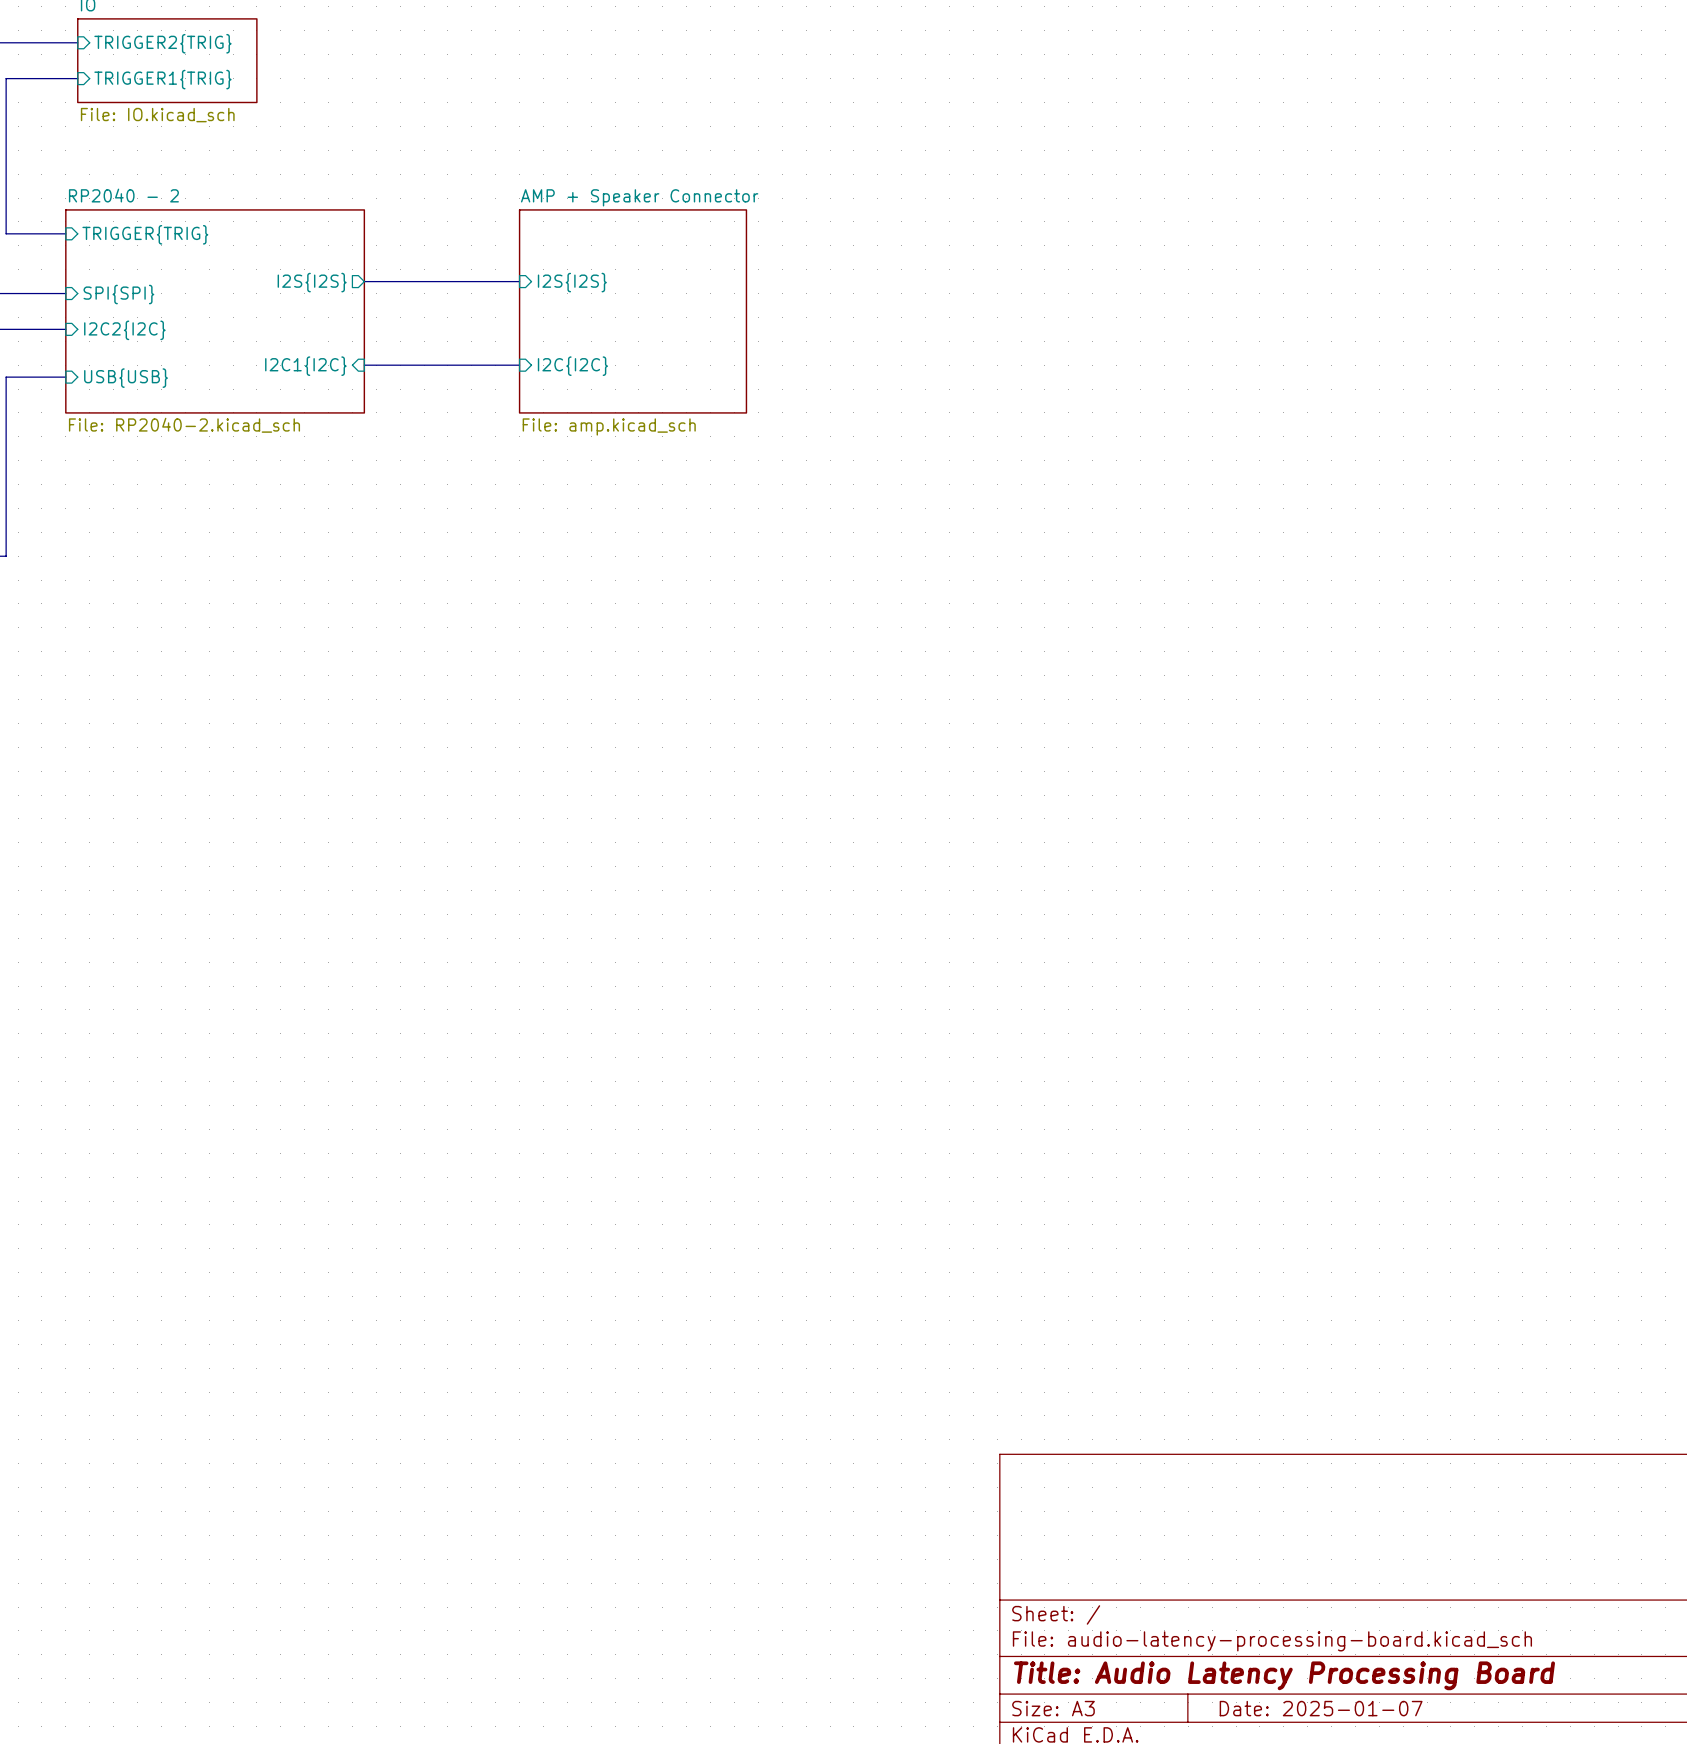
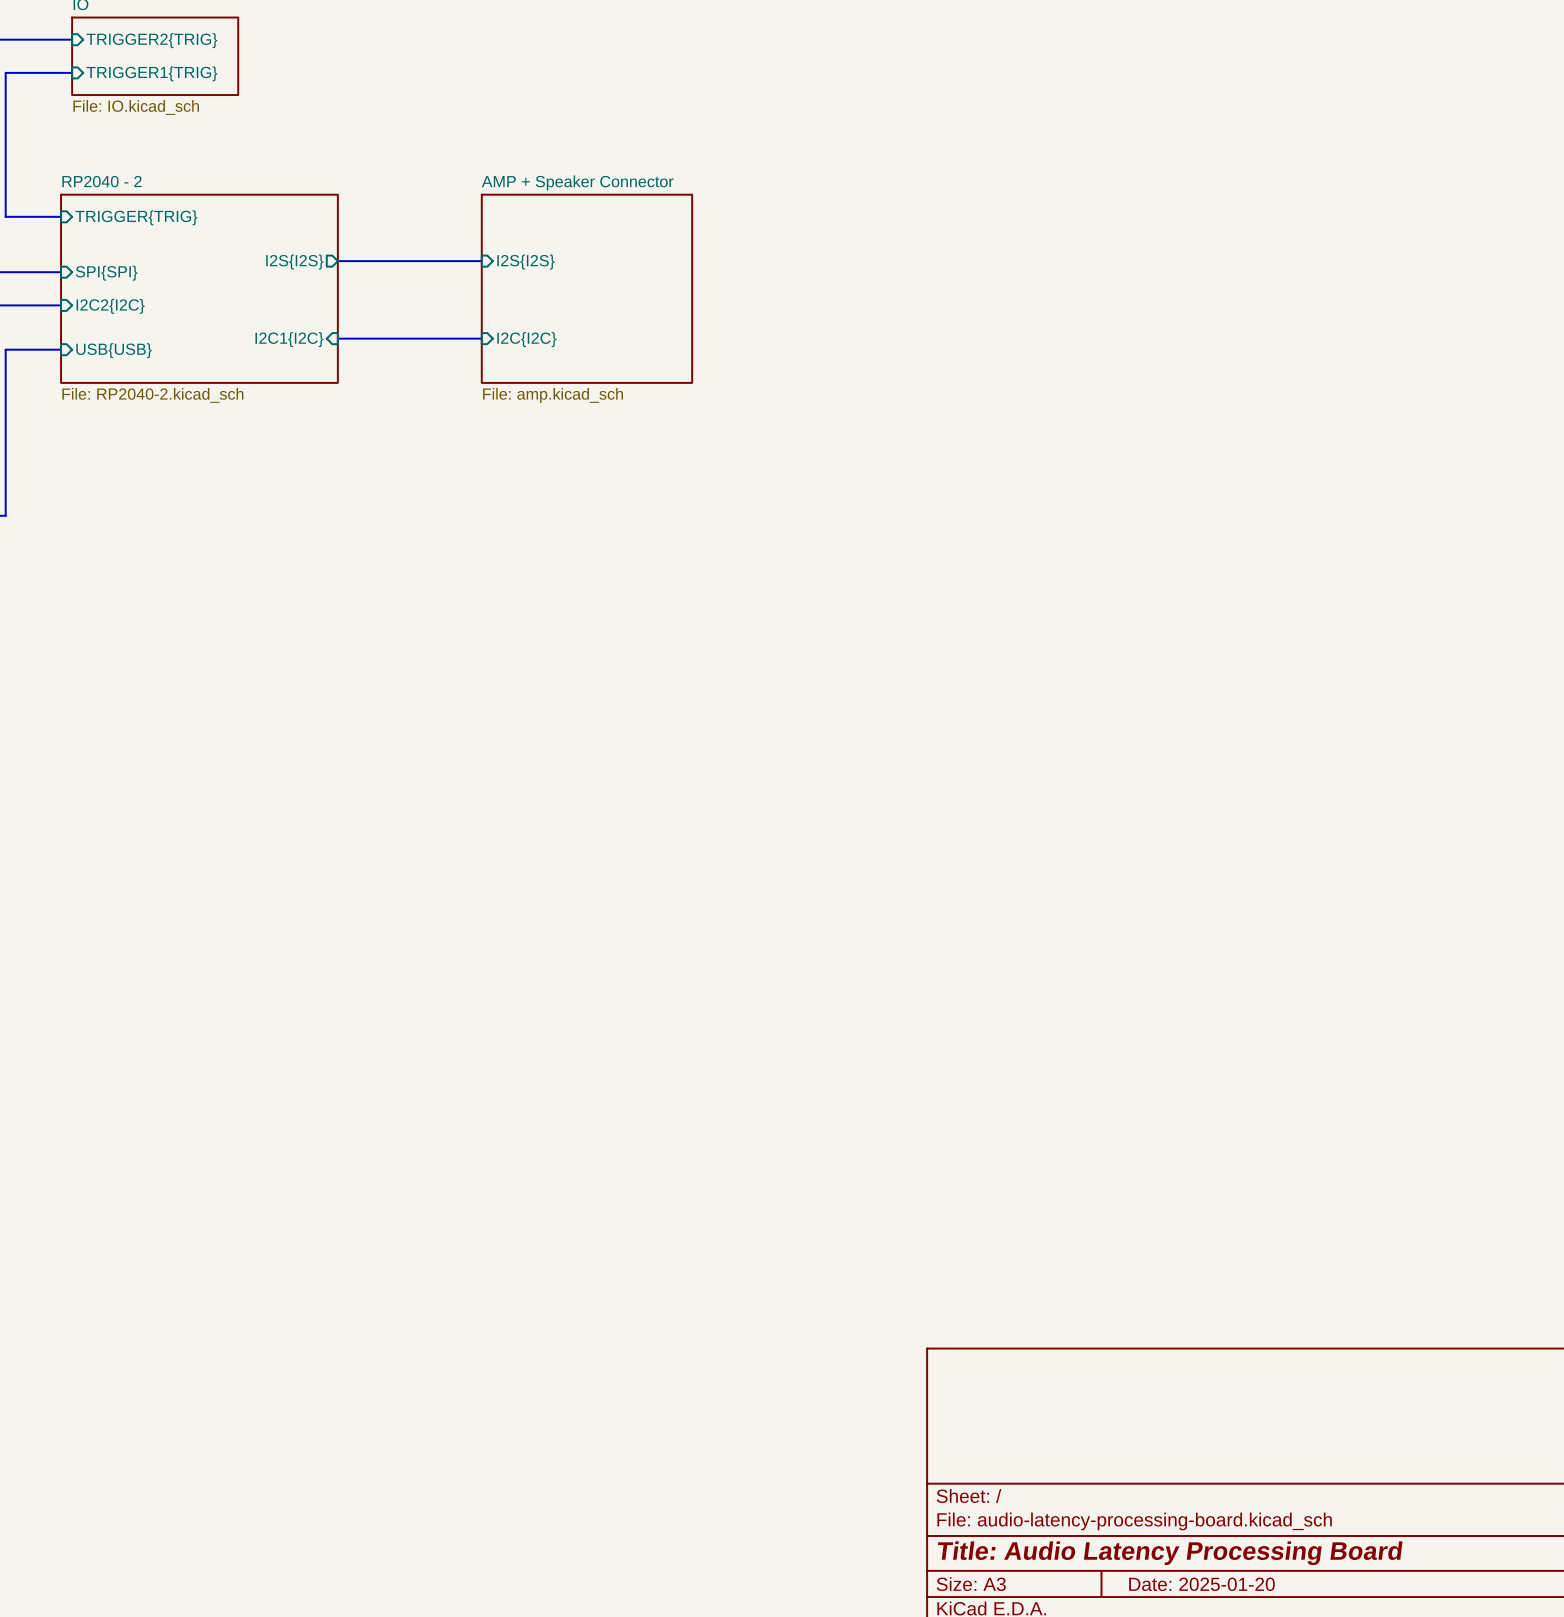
title block: Date: 2025-01-07 (1321, 1708) -> Date: 2025-01-20 (1202, 1584)

